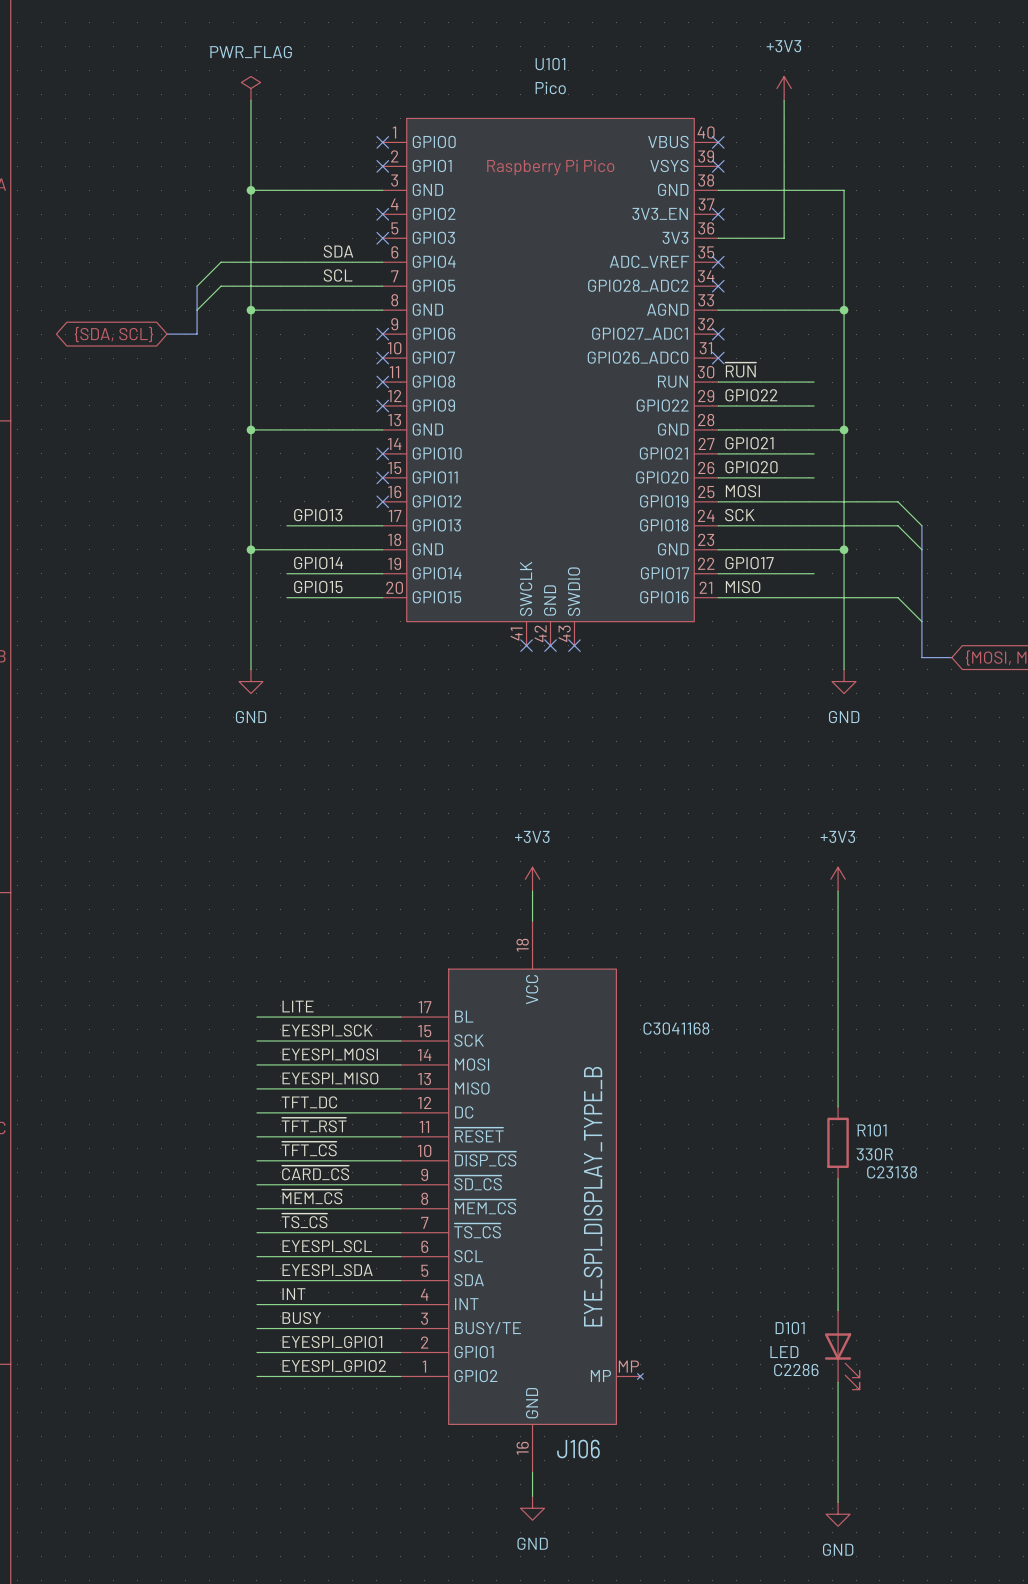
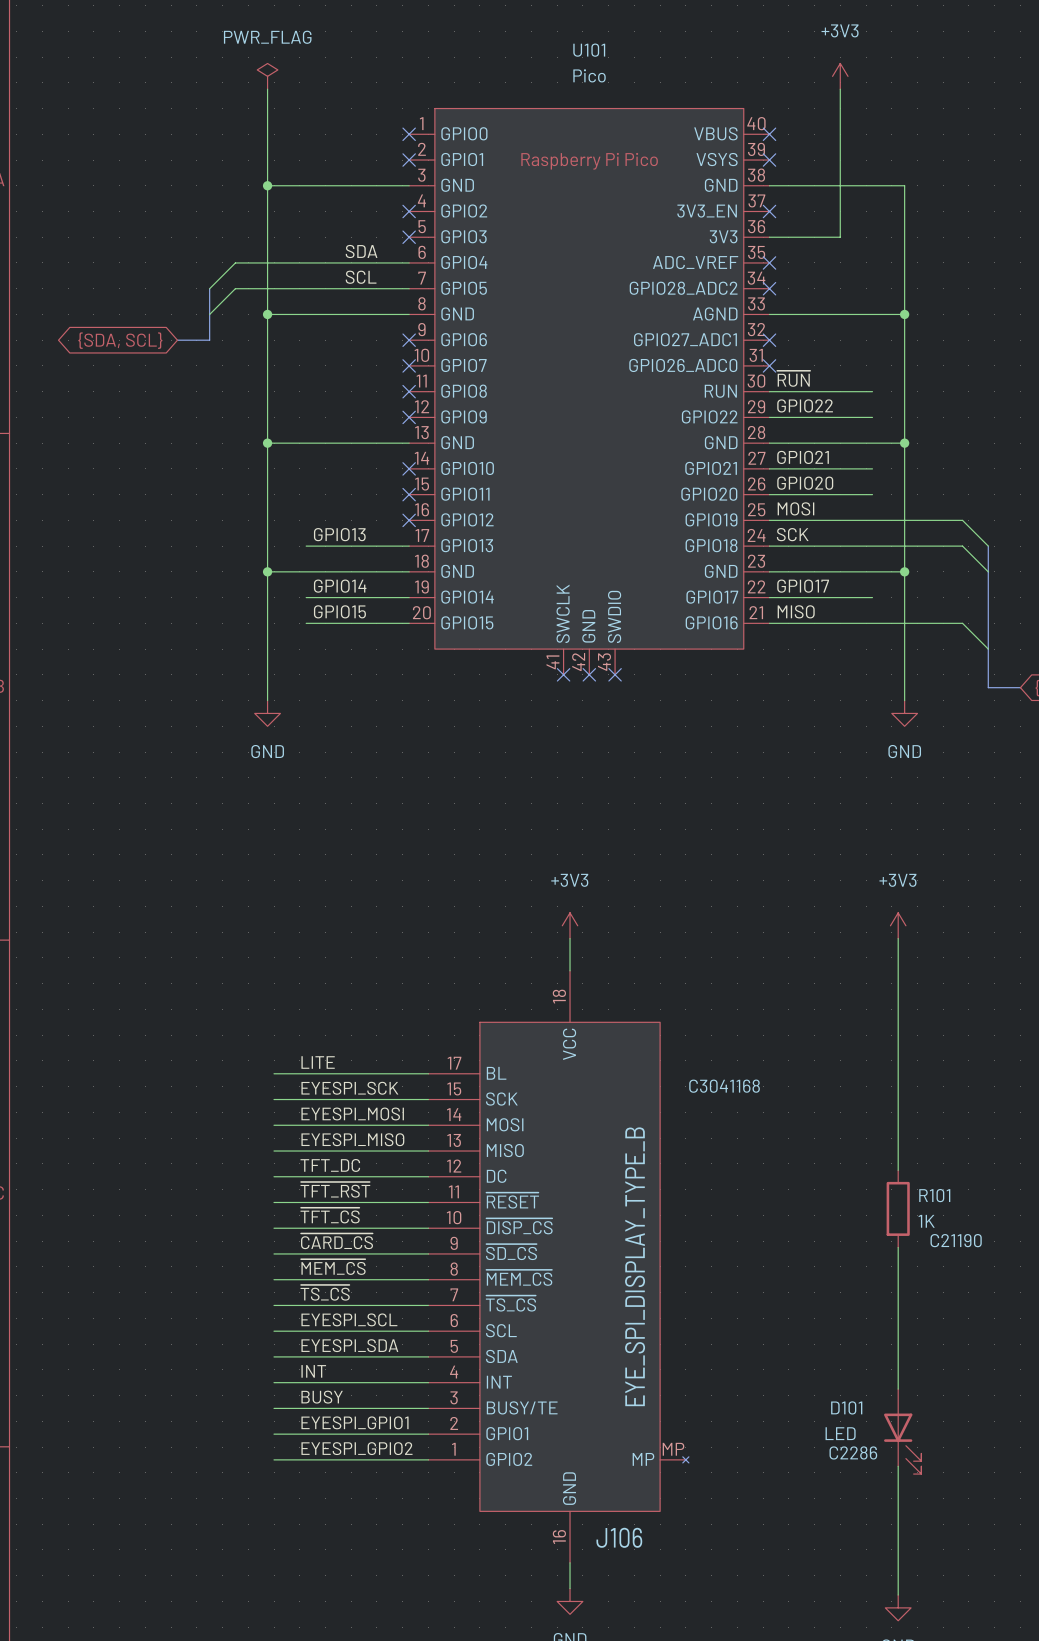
R101 value: 330R (874, 1154) -> 1K (926, 1221)
R101 text: C23138 (892, 1172) -> C21190 (956, 1240)

